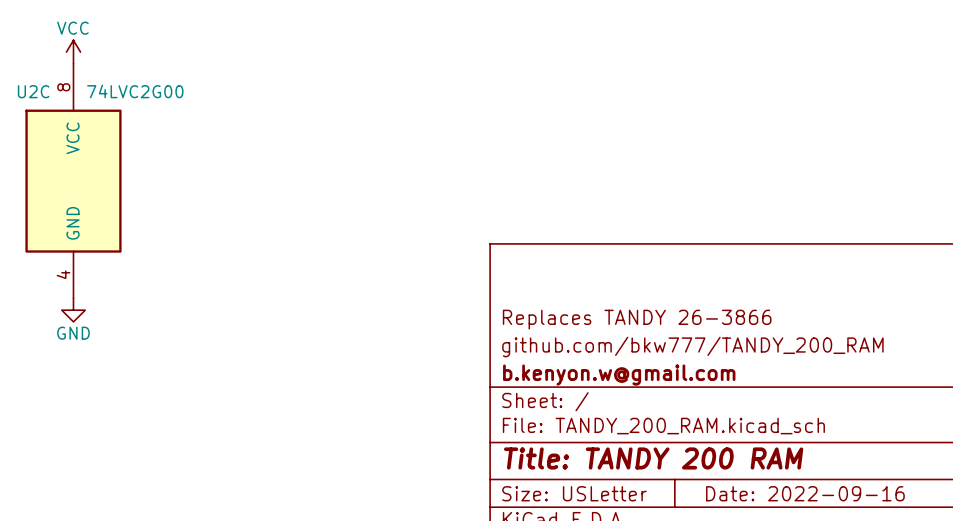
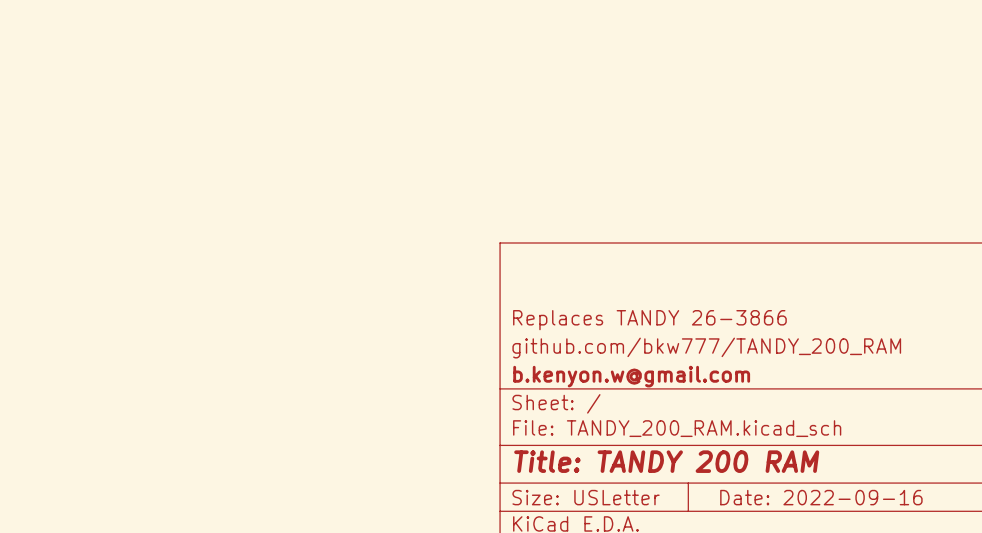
power symbol: VCC (73, 52) -> none
U2C: 74LVC2G00 (73, 181) -> none
power symbol: GND (73, 310) -> none

